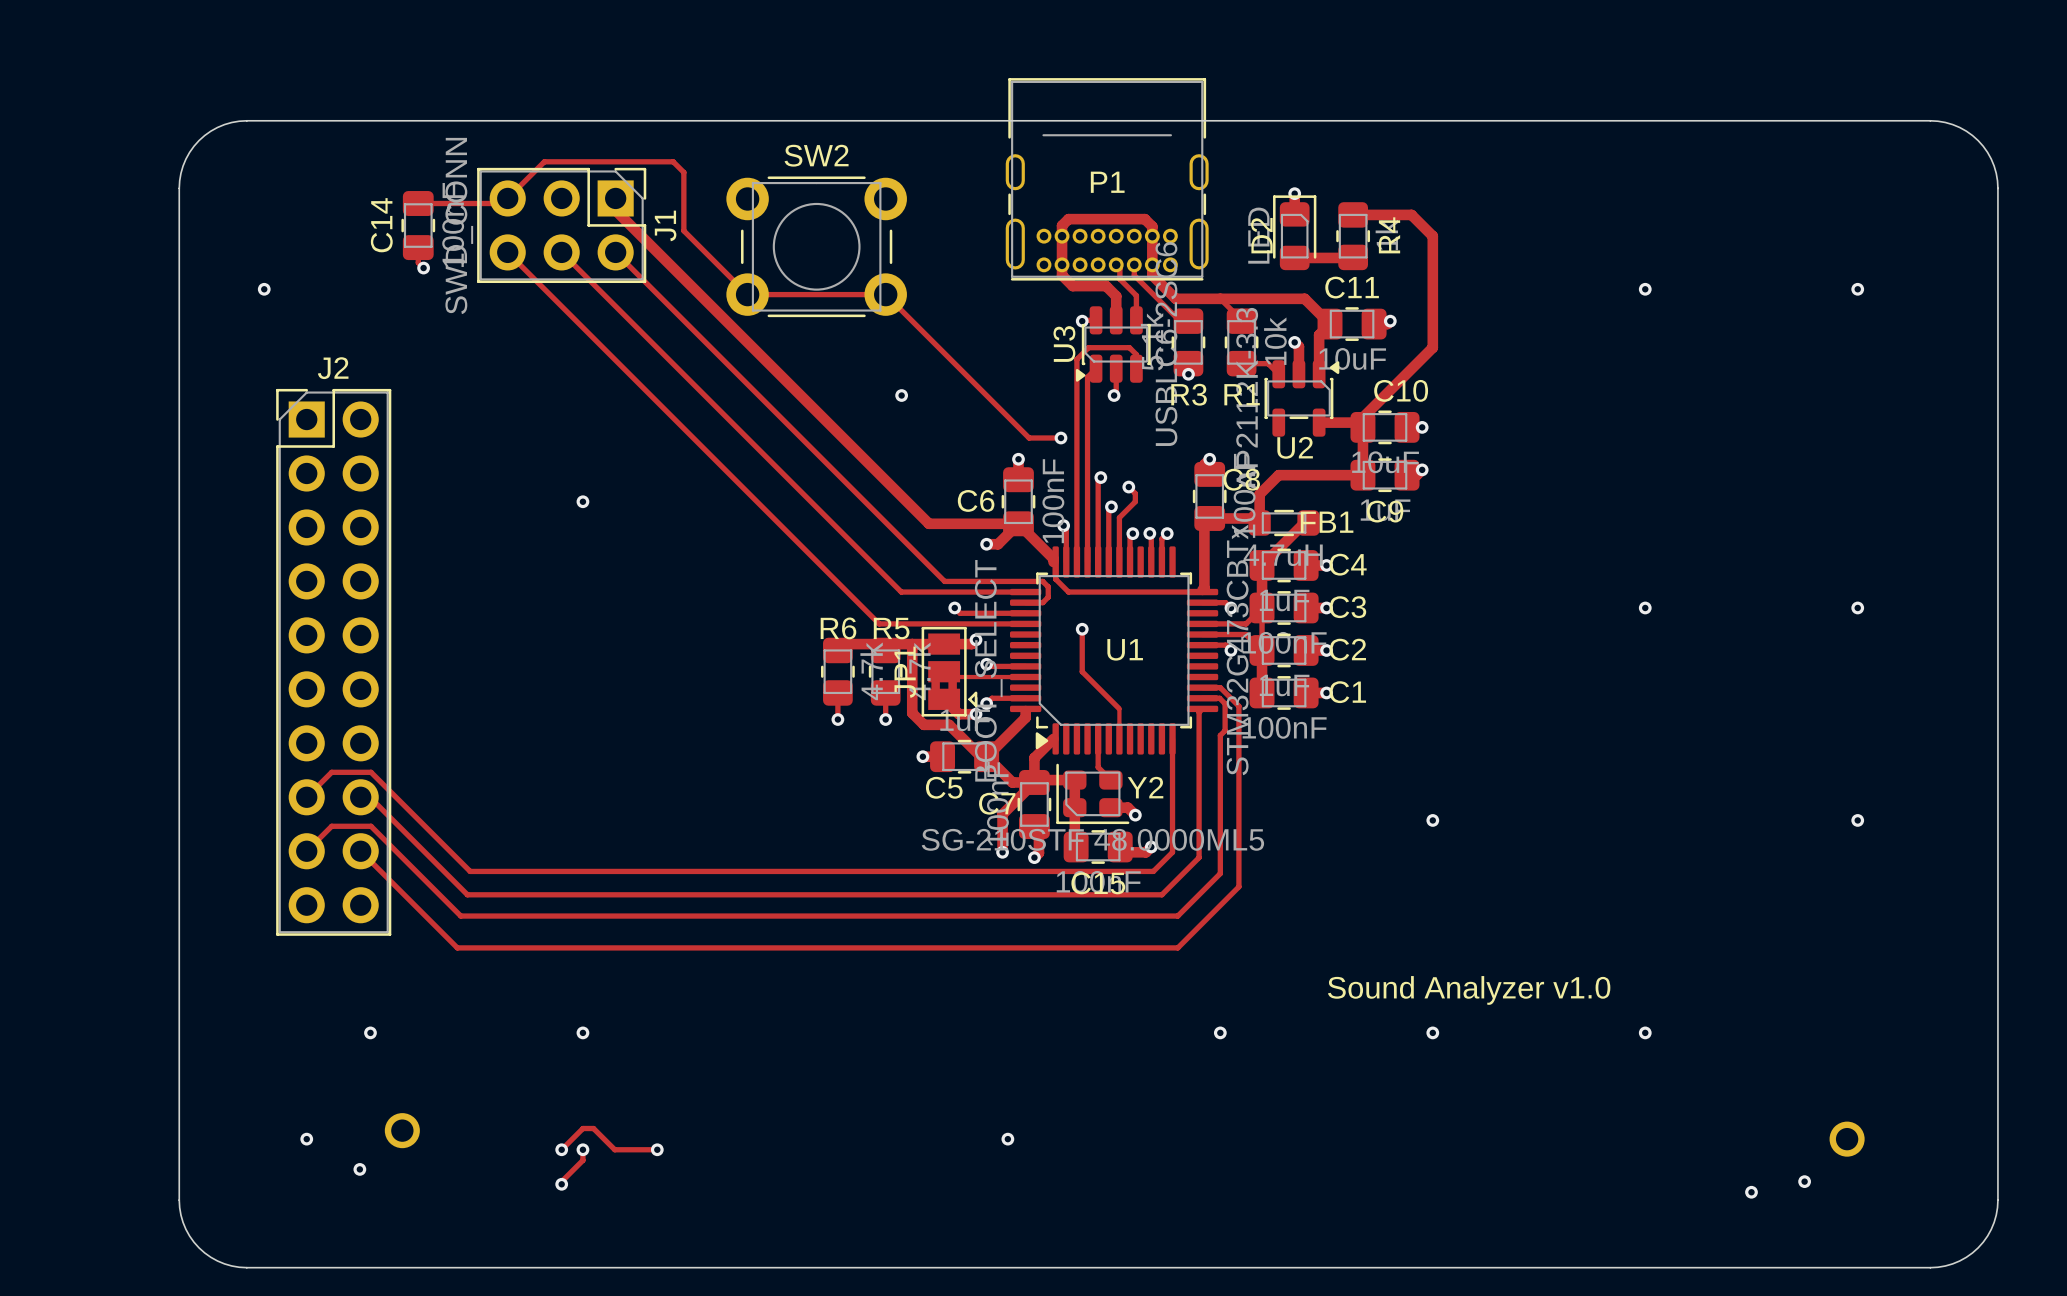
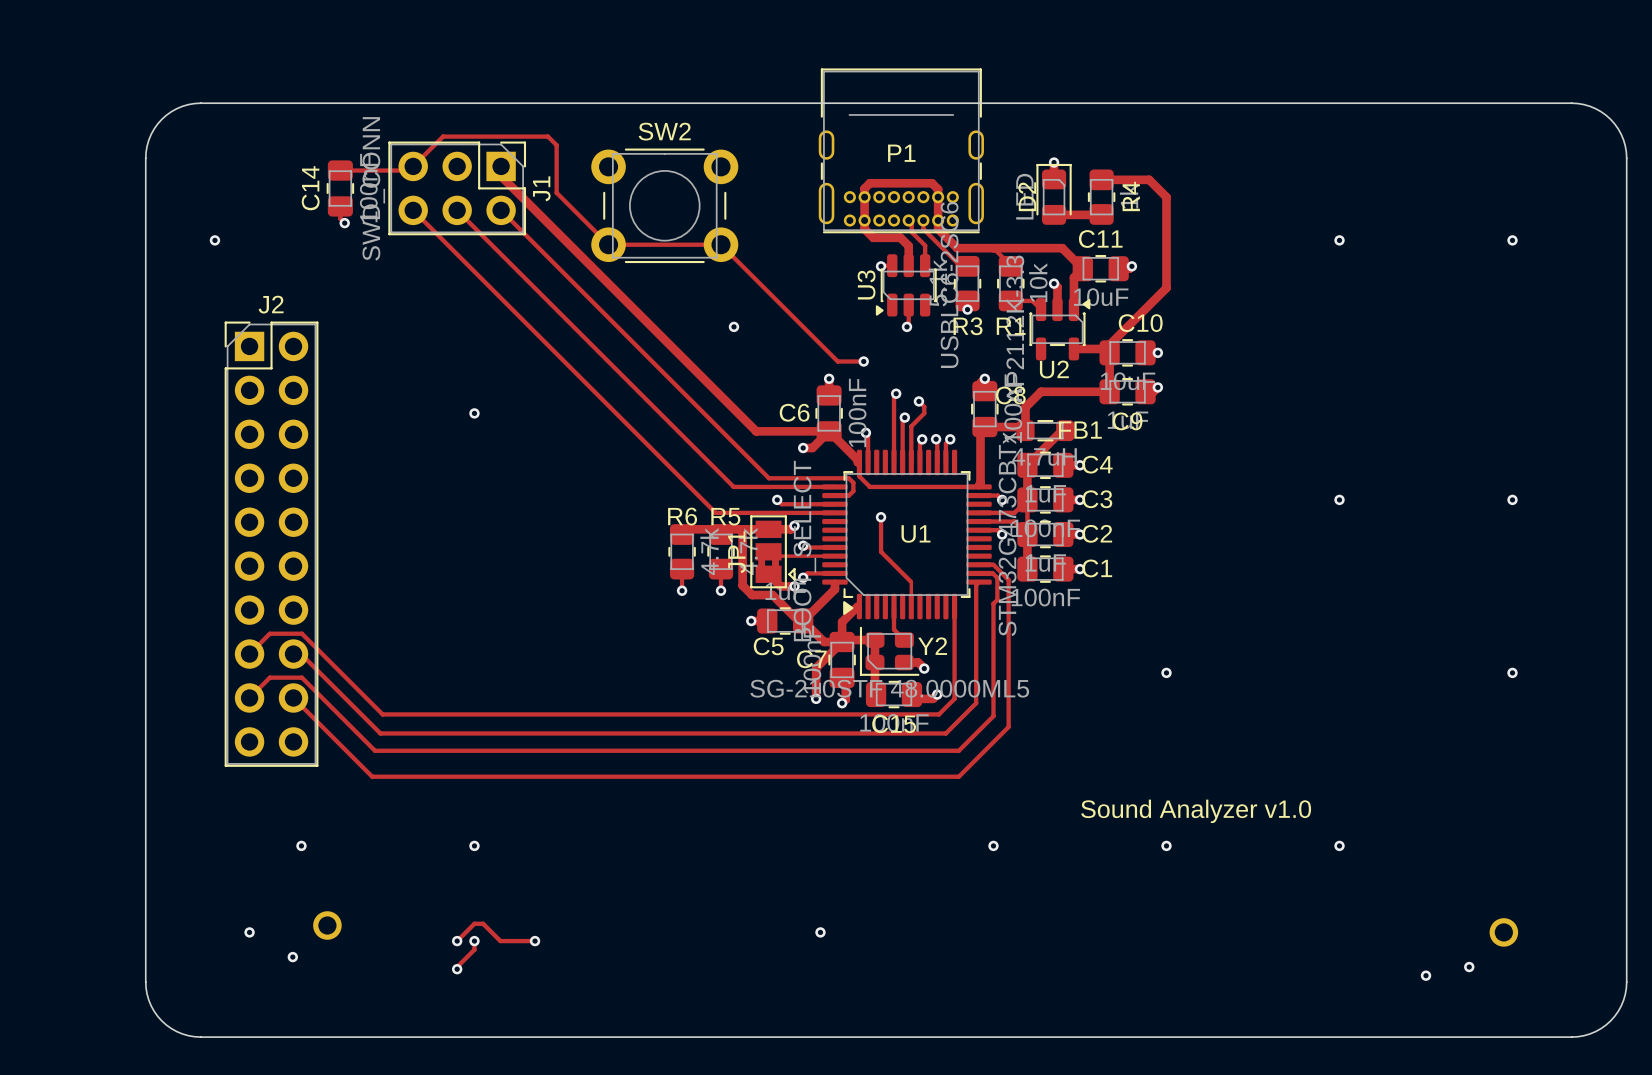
track: (1096, 368) (1087, 377) (1087, 562) -> none
track: (1136, 368) (1136, 354) (1129, 347) (1088, 347) (1076, 359) (1076, 562) -> none

